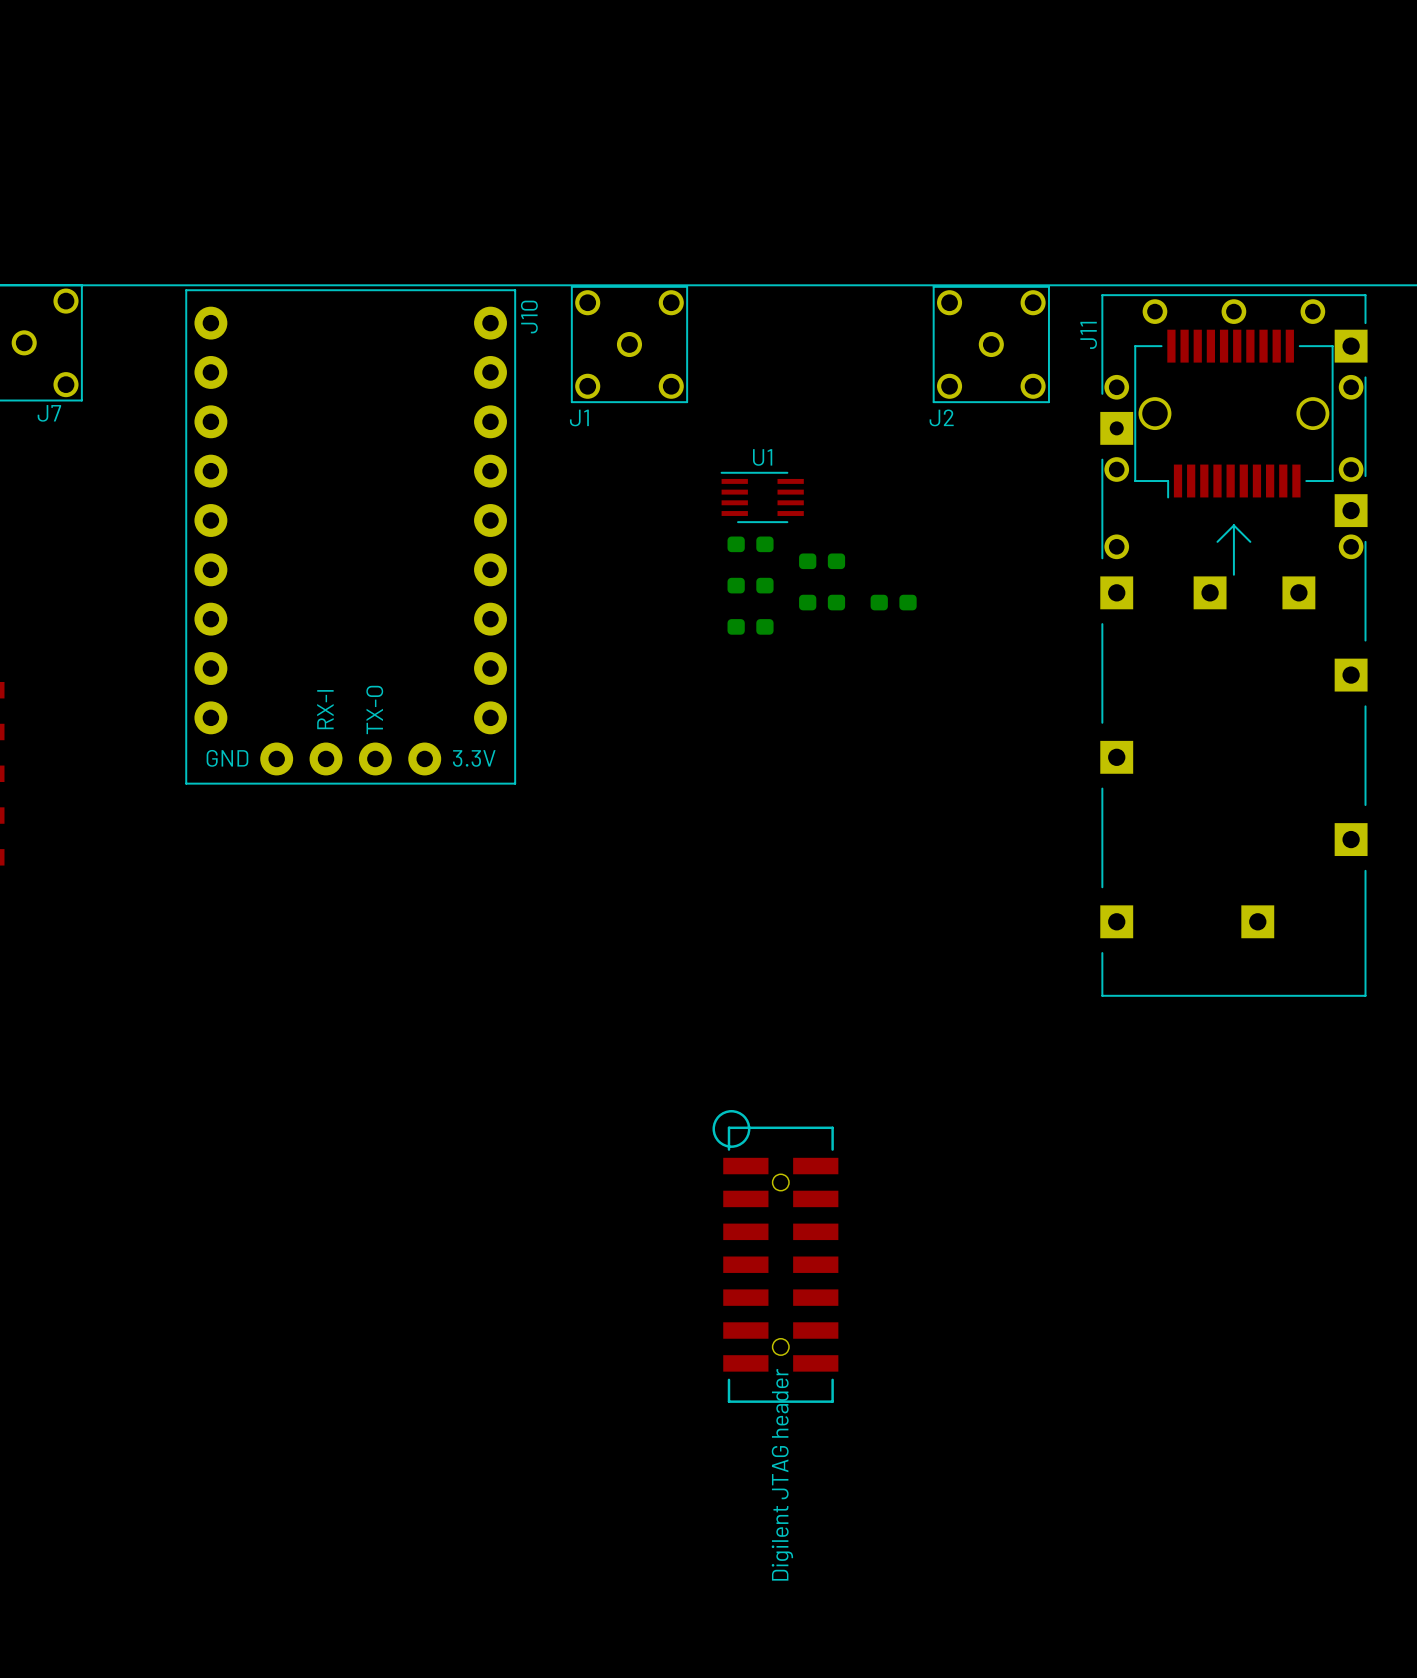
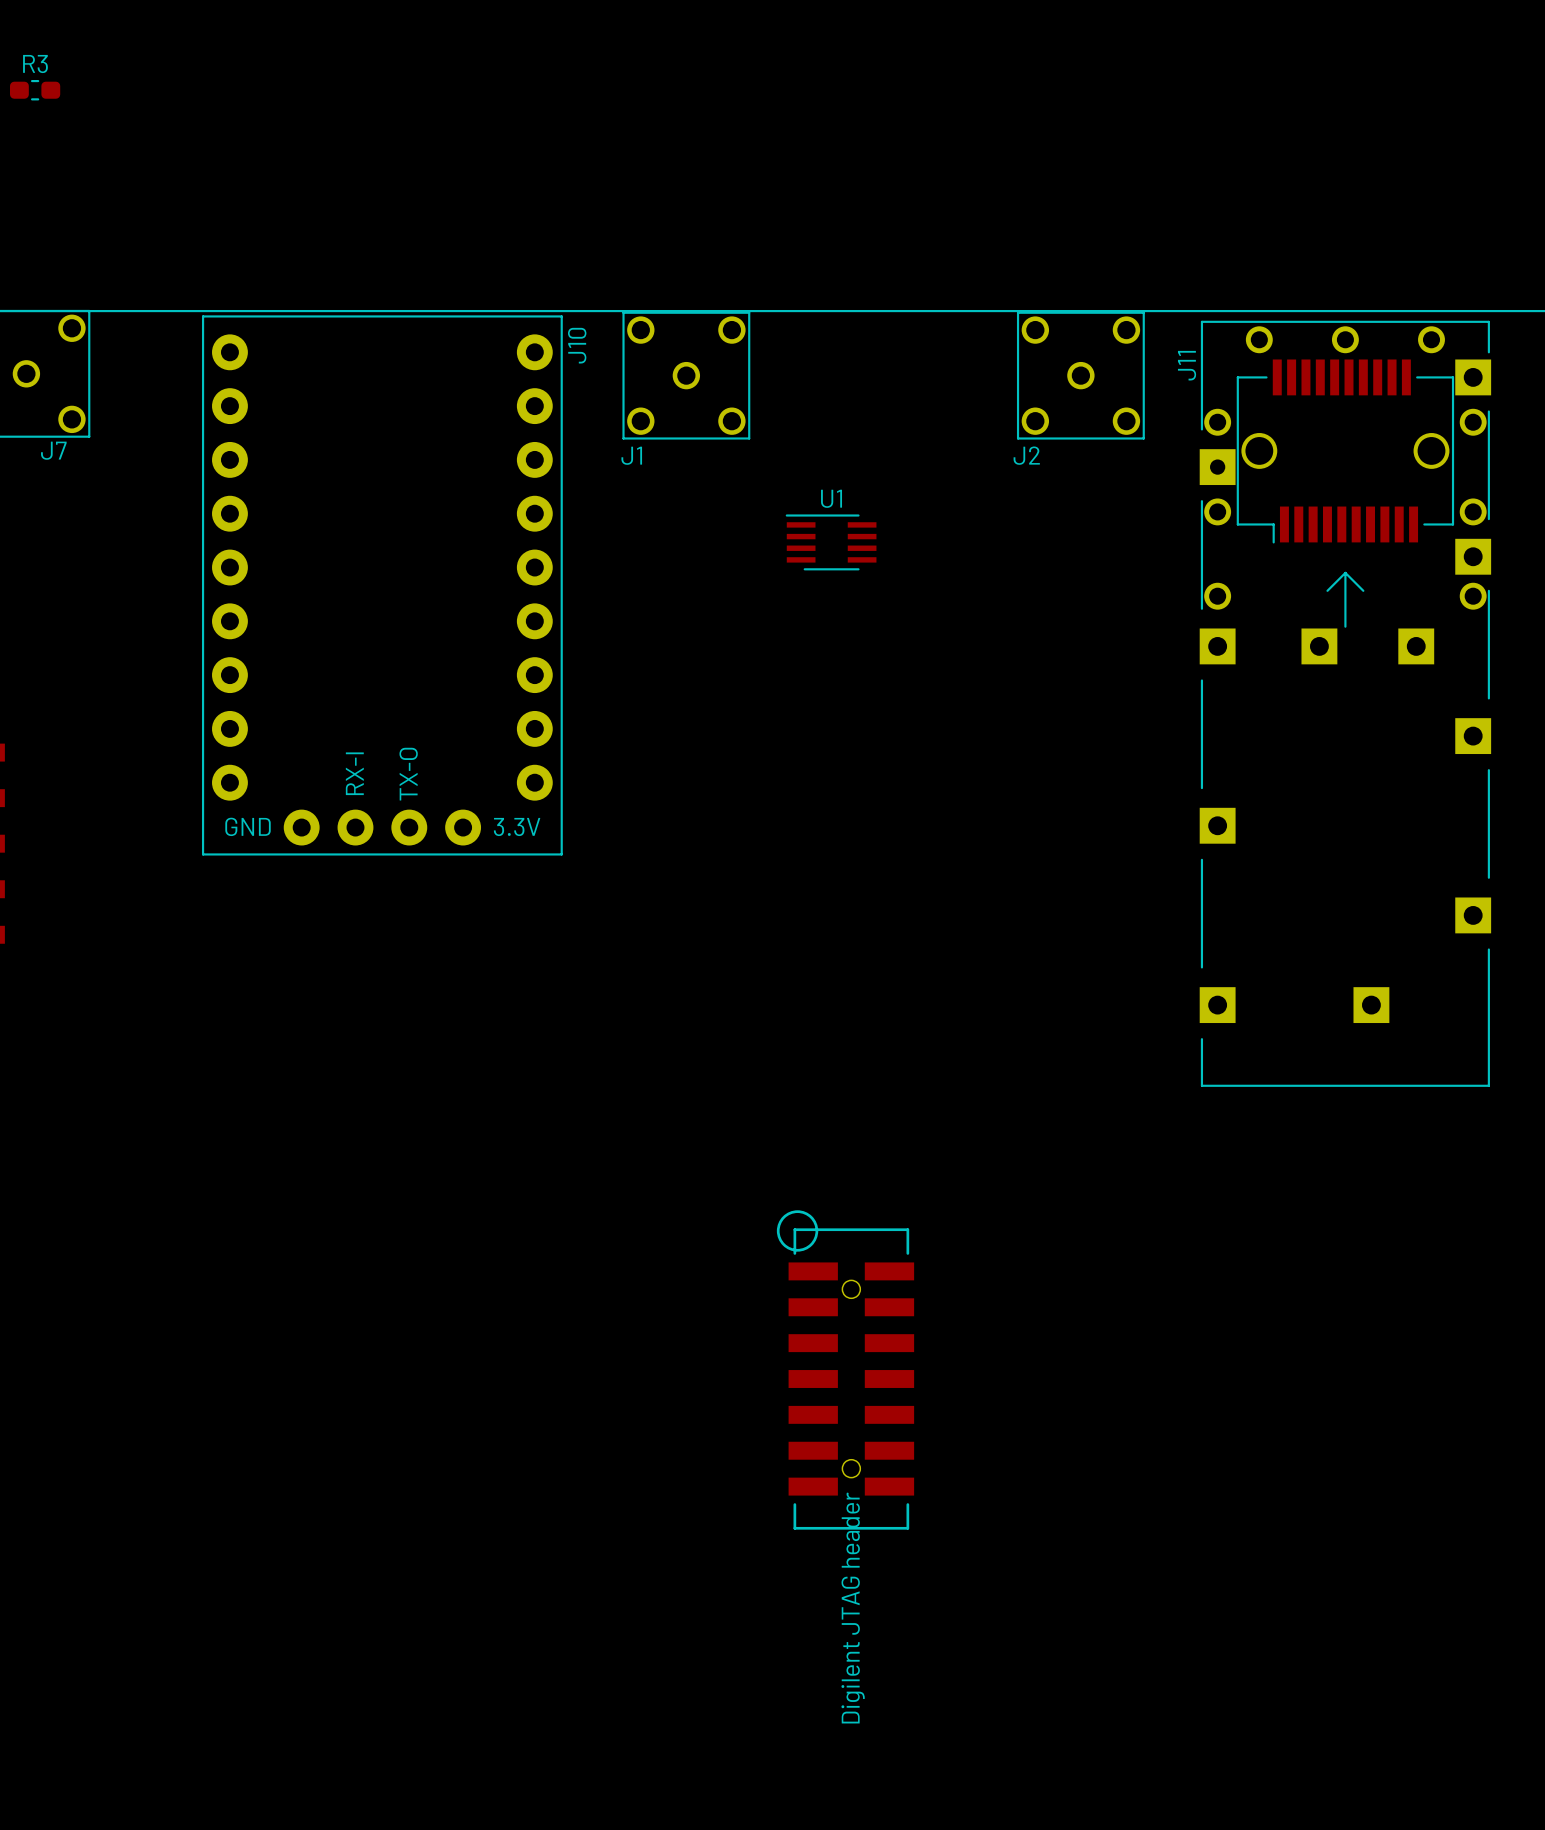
R3: none -> (35, 90)
part: (750, 544) -> none
part: (822, 561) -> none
part: (750, 585) -> none
part: (822, 602) -> none
part: (893, 602) -> none
part: (750, 626) -> none

